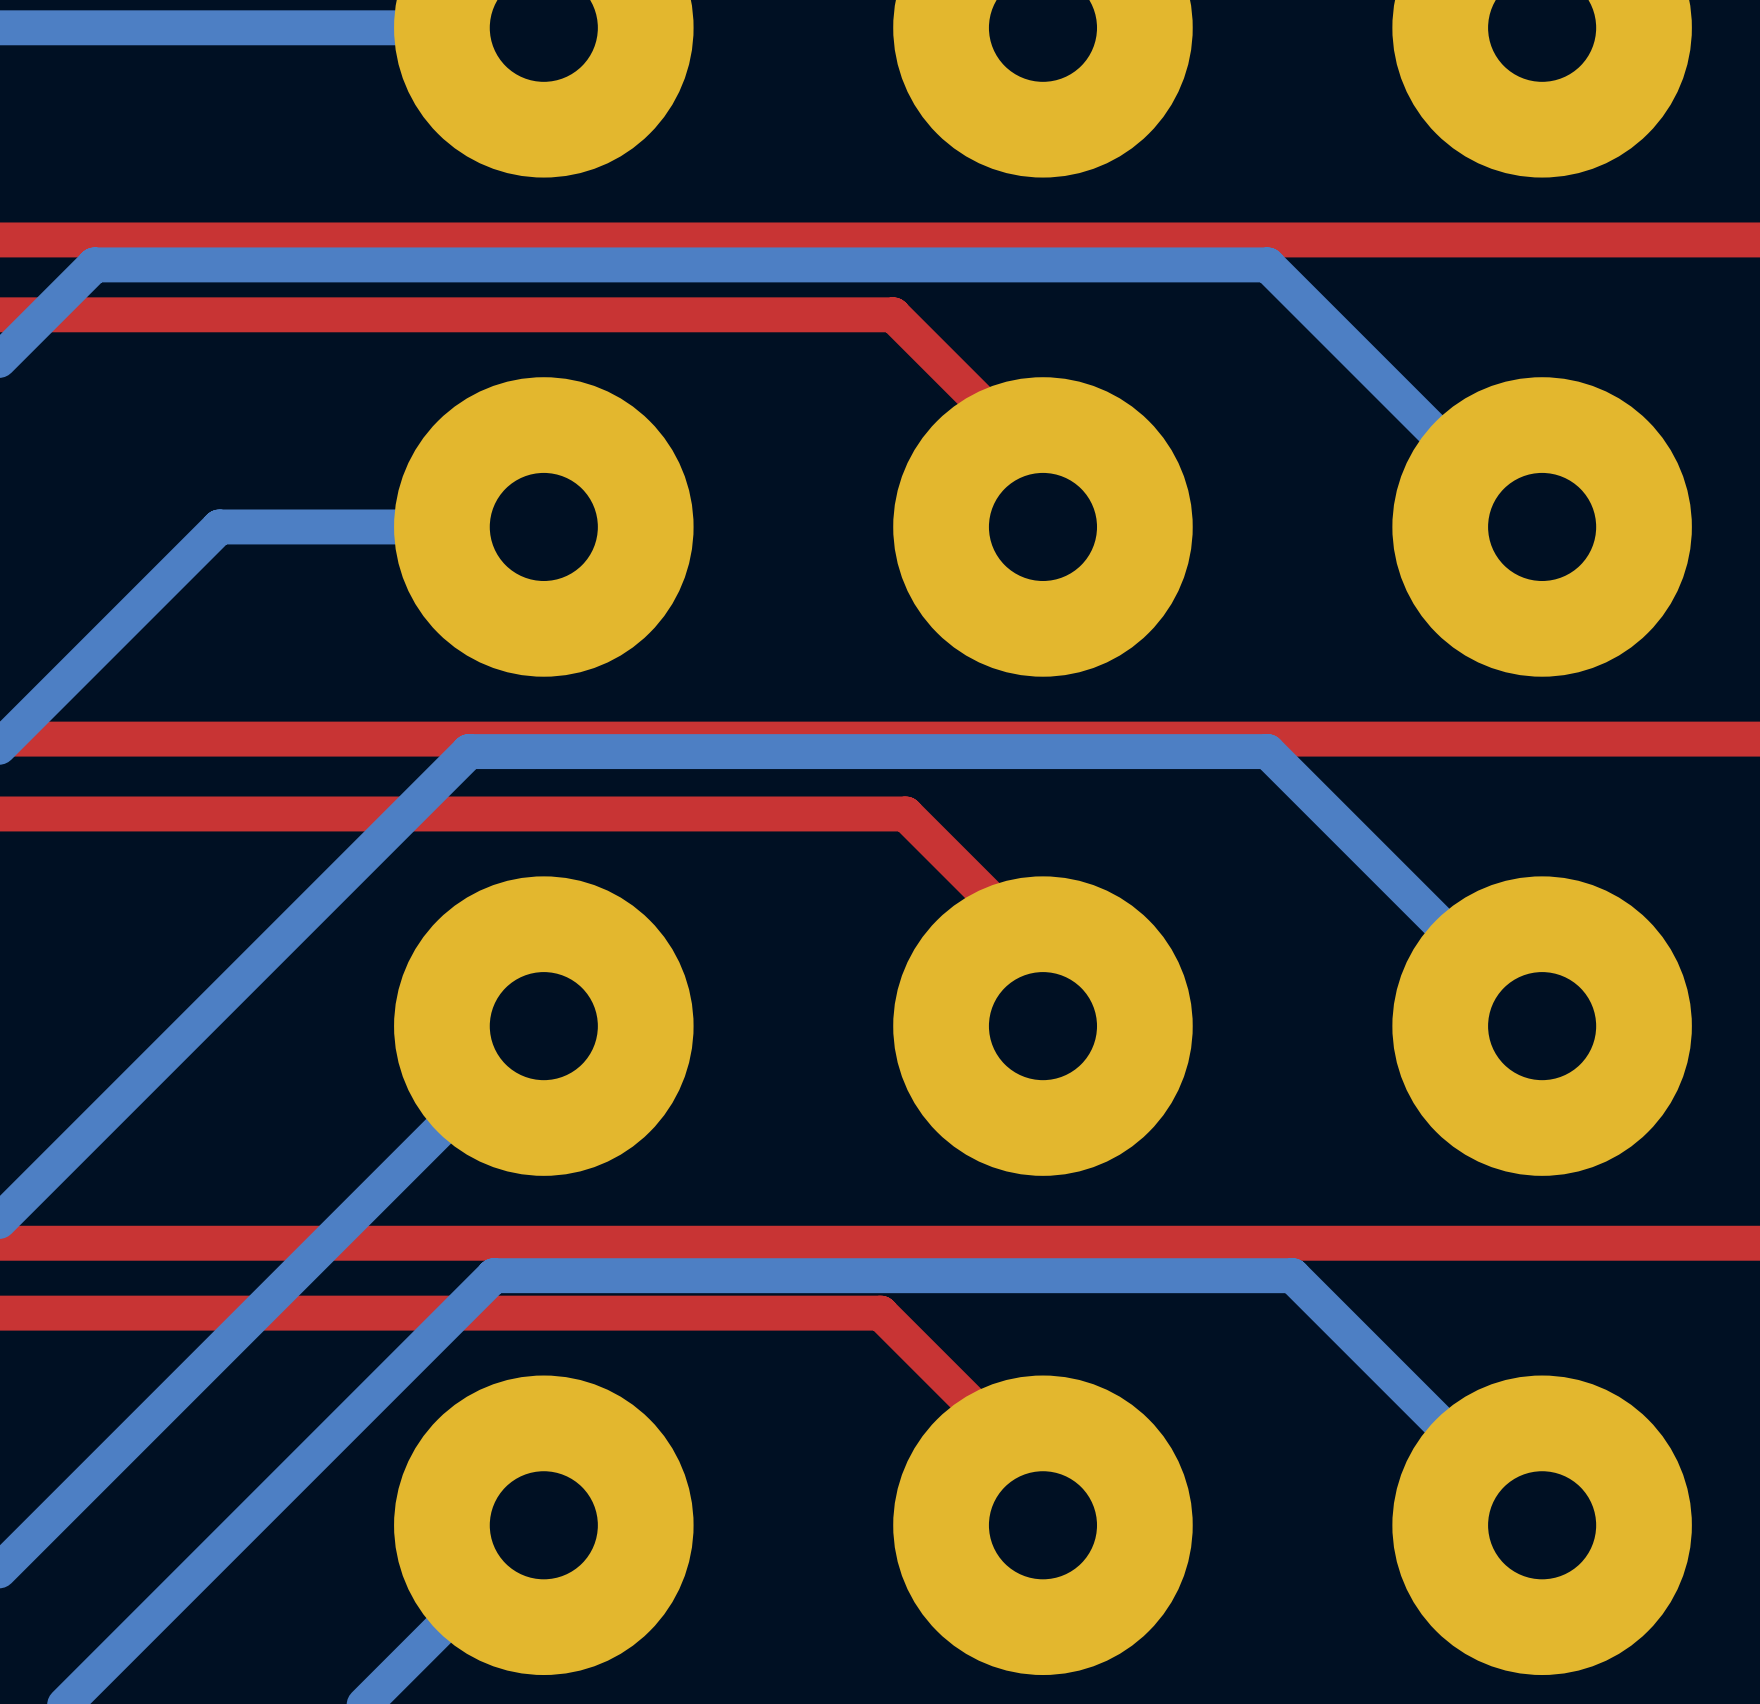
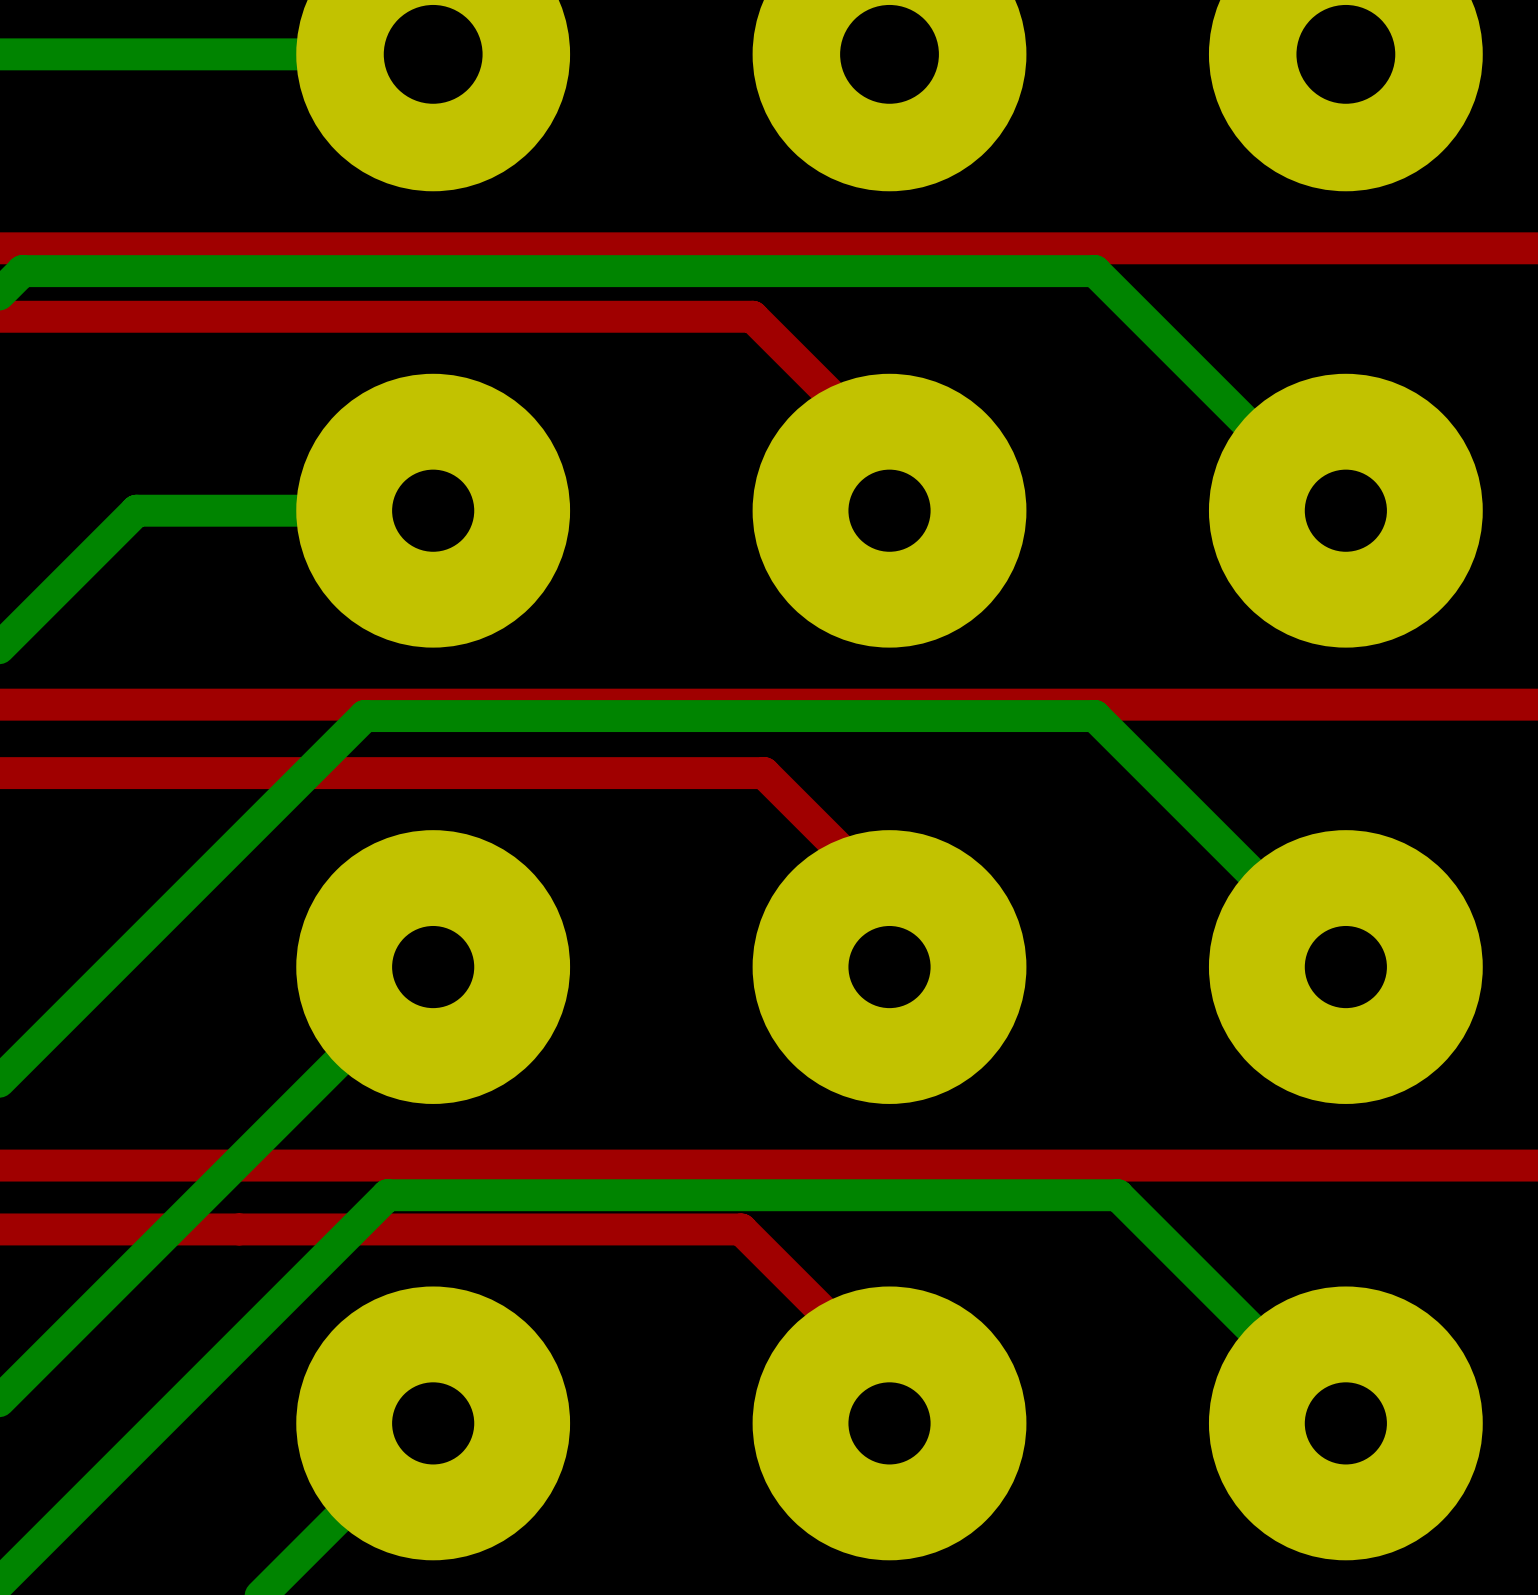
part footprint: [394, 377, 694, 677] -> [296, 373, 571, 648]
part footprint: [893, 377, 1193, 677] -> [752, 373, 1027, 648]
part footprint: [1392, 377, 1692, 677] -> [1208, 373, 1483, 648]
part footprint: [394, 876, 694, 1176] -> [296, 830, 571, 1104]
part footprint: [893, 876, 1193, 1176] -> [752, 830, 1027, 1104]
part footprint: [1392, 876, 1692, 1176] -> [1208, 830, 1483, 1104]
part footprint: [394, 1375, 694, 1676] -> [296, 1286, 571, 1561]
part footprint: [893, 1375, 1193, 1676] -> [752, 1286, 1027, 1561]
part footprint: [1392, 1375, 1692, 1676] -> [1208, 1286, 1483, 1561]

